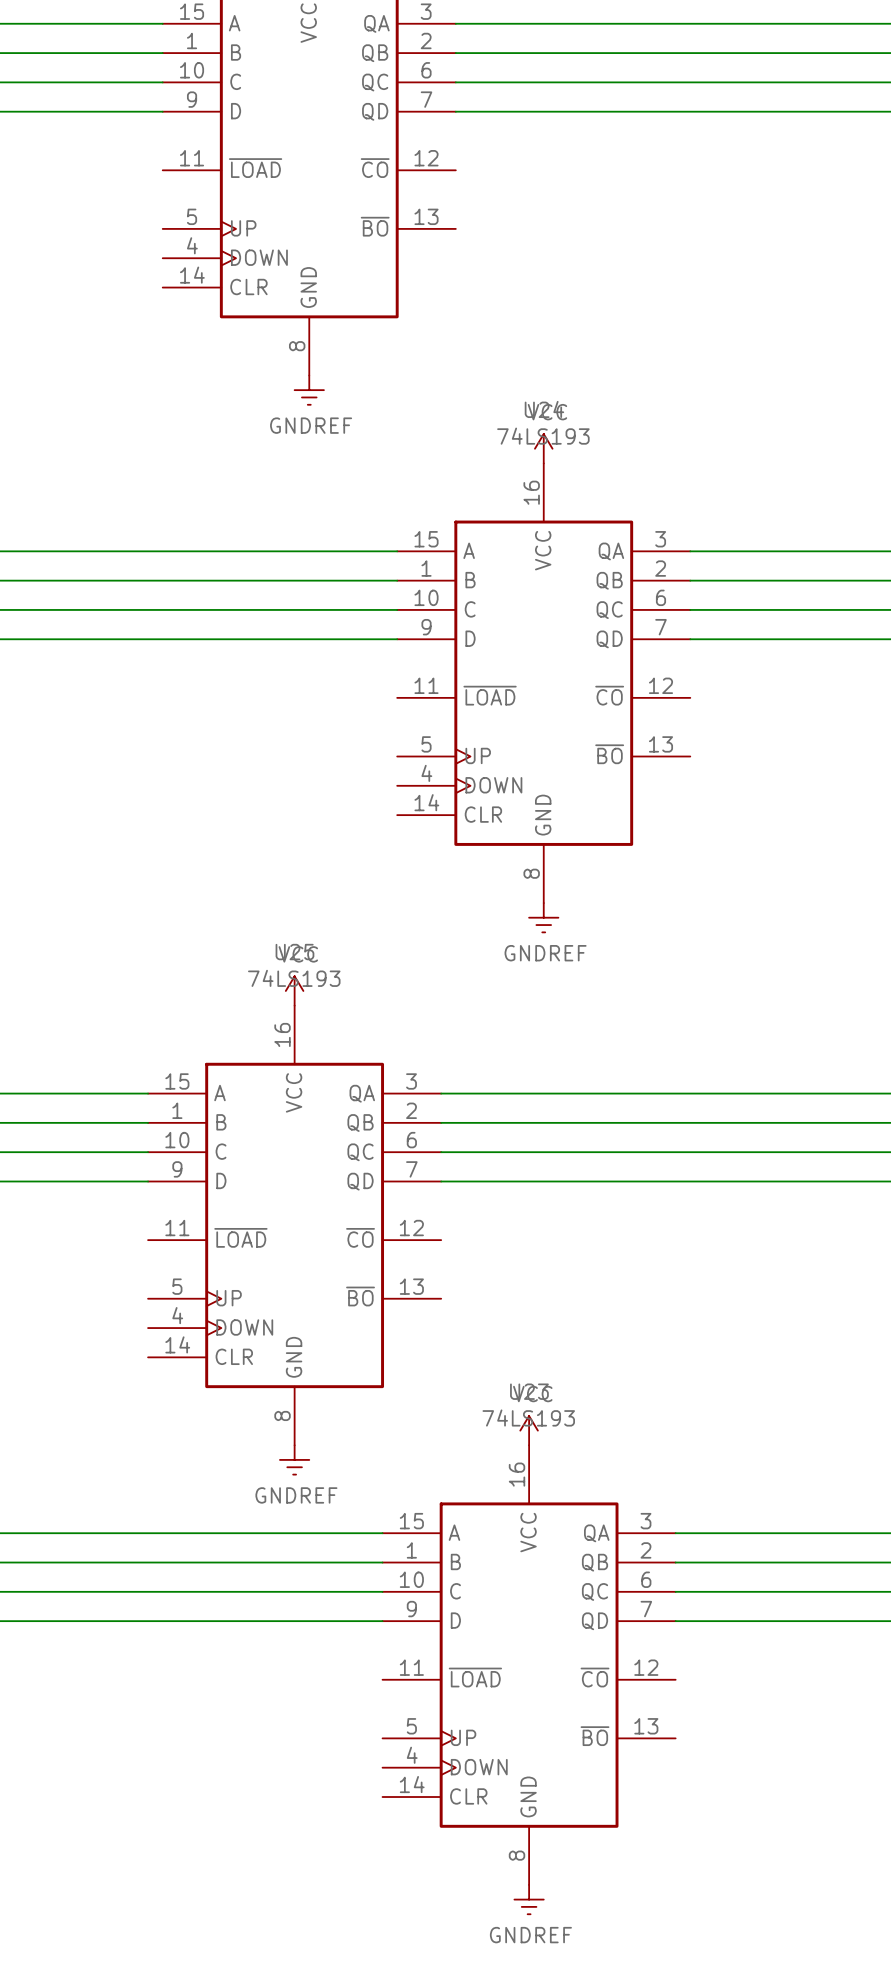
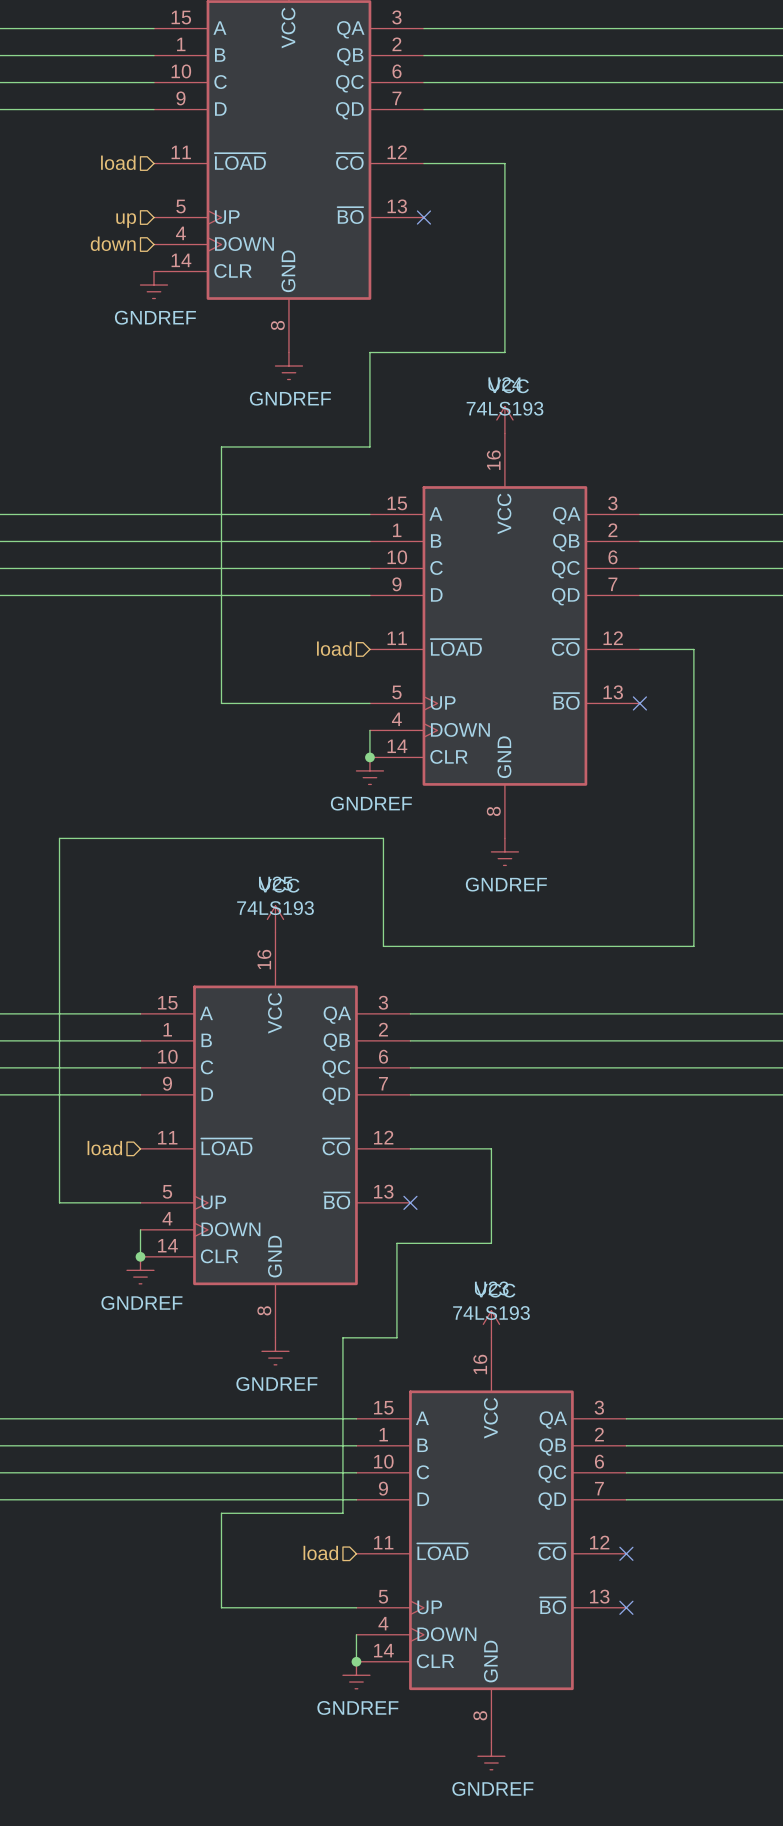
hierarchical label: none -> load (118, 162)
wire: none -> (423, 163) (504, 163) (504, 352) (369, 352) (369, 446) (221, 446) (221, 703) (369, 703)
no-connect mark: none -> (423, 217)
hierarchical label: none -> up (126, 220)
hierarchical label: none -> down (113, 243)
power symbol: none -> GNDREF (153, 285)
hierarchical label: none -> load (334, 648)
wire: none -> (639, 649) (693, 649) (693, 946) (383, 946) (383, 838) (59, 838) (59, 1202) (140, 1202)
no-connect mark: none -> (639, 703)
wire: none -> (369, 730) (369, 757)
junction: none -> (369, 757)
power symbol: none -> GNDREF (369, 770)
hierarchical label: none -> load (104, 1148)
wire: none -> (410, 1148) (491, 1148) (491, 1243) (396, 1243) (396, 1337) (342, 1337) (342, 1513) (221, 1513) (221, 1607) (356, 1607)
no-connect mark: none -> (410, 1202)
wire: none -> (140, 1229) (140, 1256)
junction: none -> (140, 1256)
power symbol: none -> GNDREF (140, 1270)
hierarchical label: none -> load (320, 1553)
no-connect mark: none -> (626, 1553)
no-connect mark: none -> (626, 1607)
wire: none -> (356, 1634) (356, 1661)
junction: none -> (356, 1661)
power symbol: none -> GNDREF (356, 1675)

